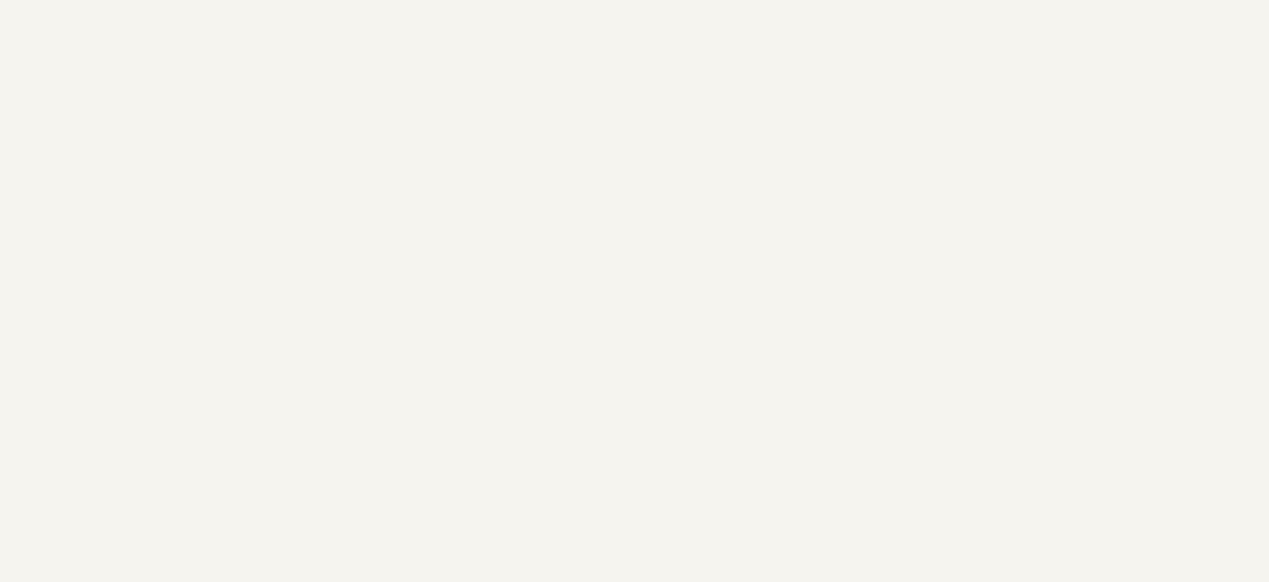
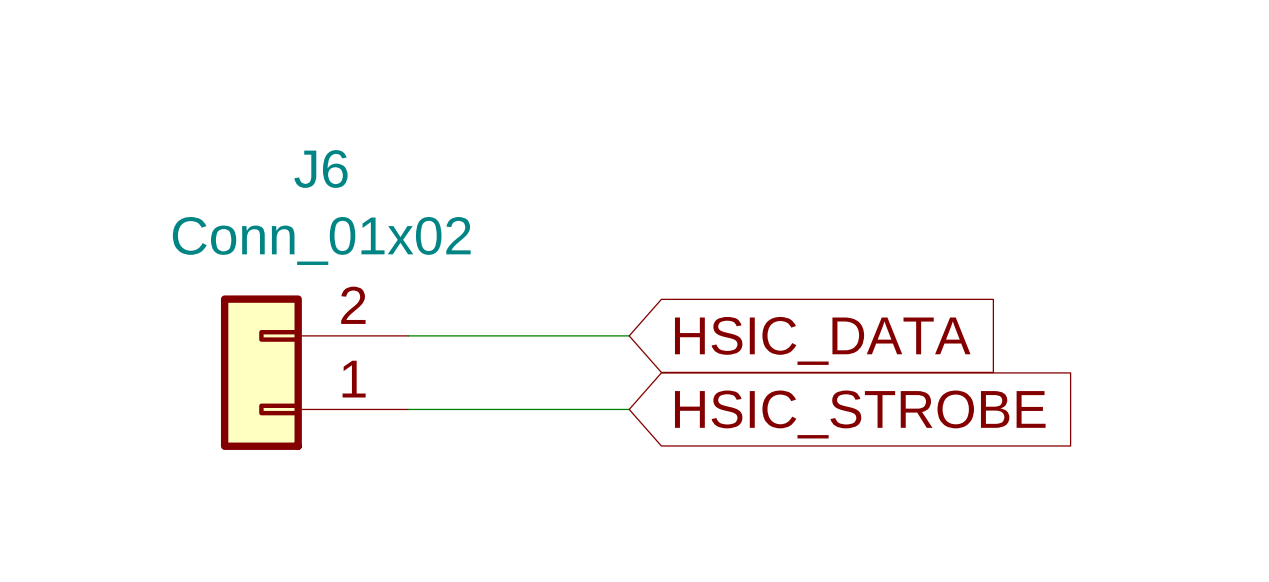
wire: none -> (408, 335) (629, 335)
global label: none -> HSIC_DATA (822, 340)
J6: none -> Conn_01x02 (314, 372)
wire: none -> (408, 409) (629, 409)
global label: none -> HSIC_STROBE (860, 414)

